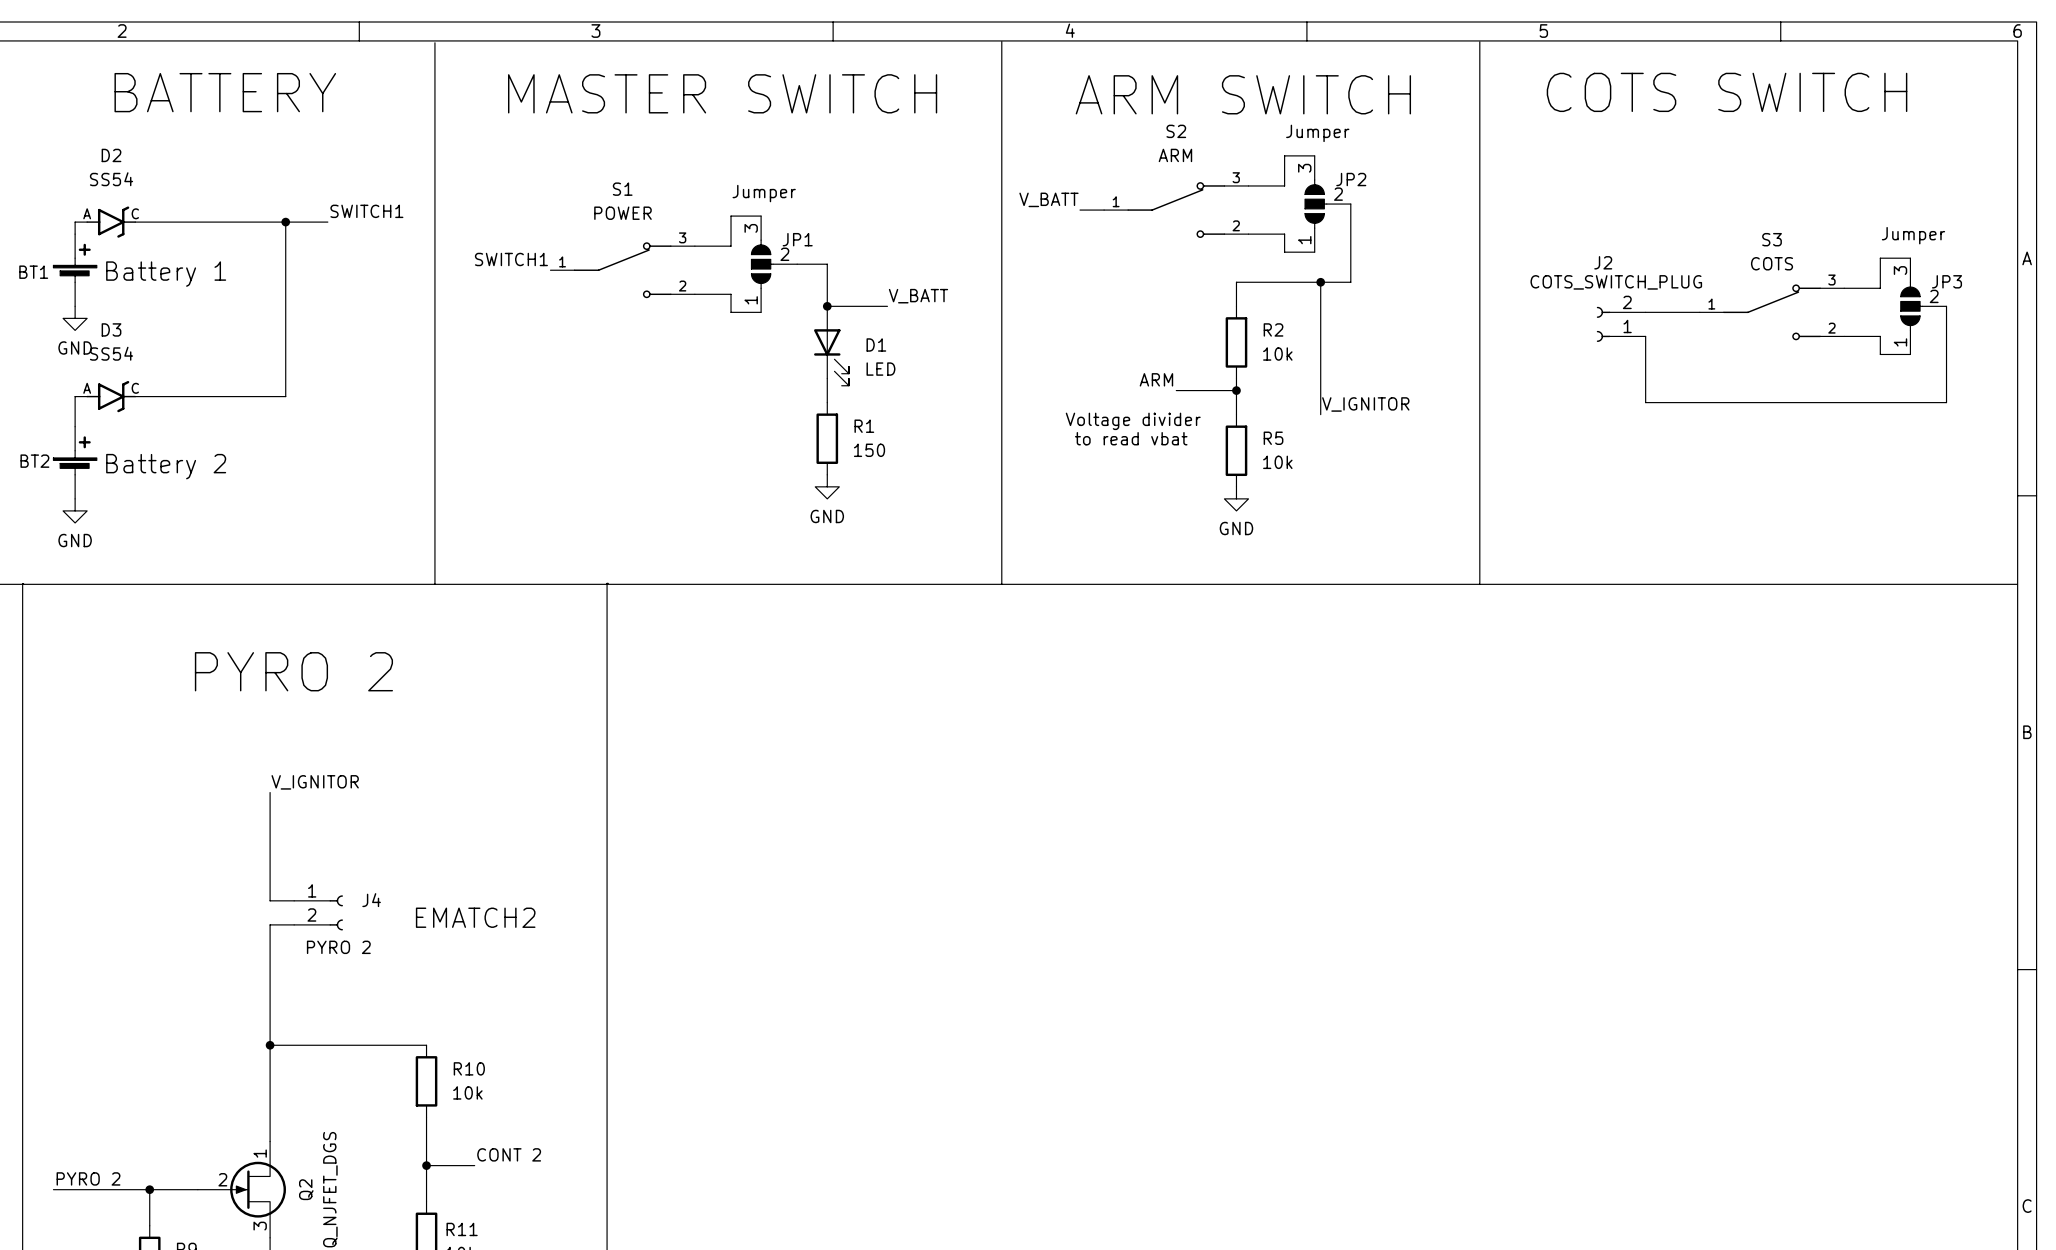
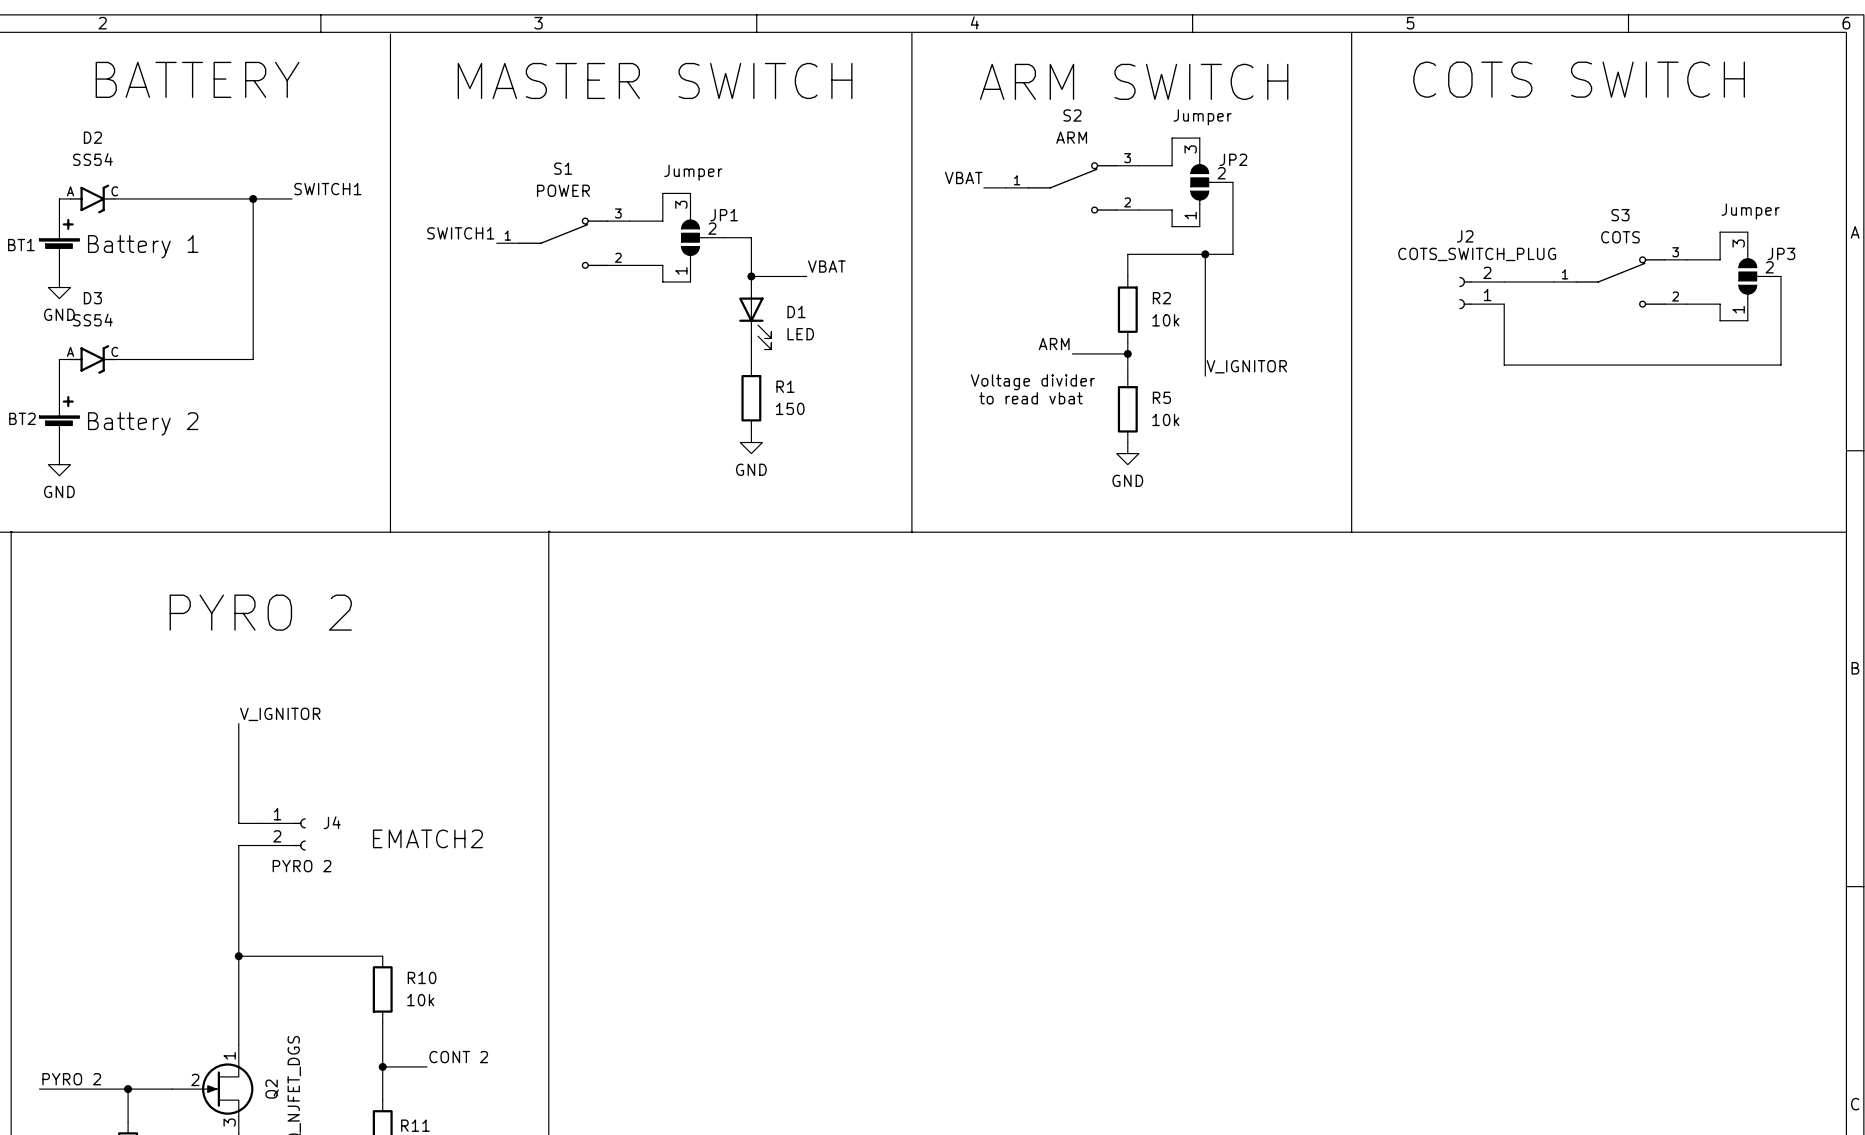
label: V_BATT (1048, 199) -> VBAT (963, 178)
label: V_BATT (918, 296) -> VBAT (826, 266)

